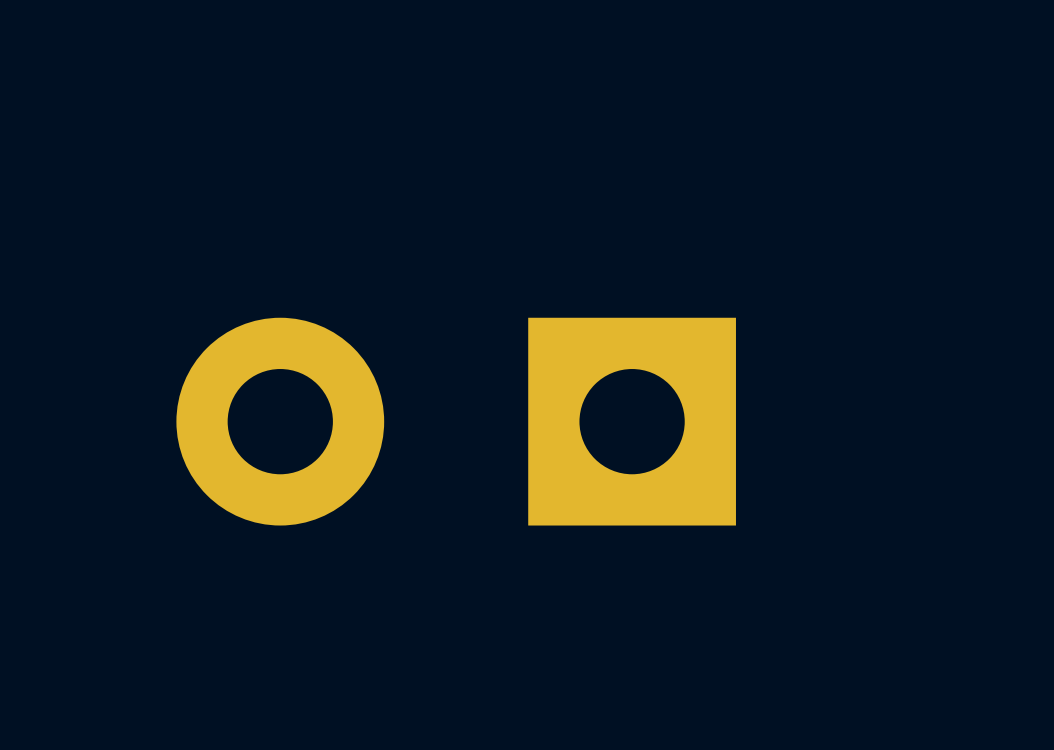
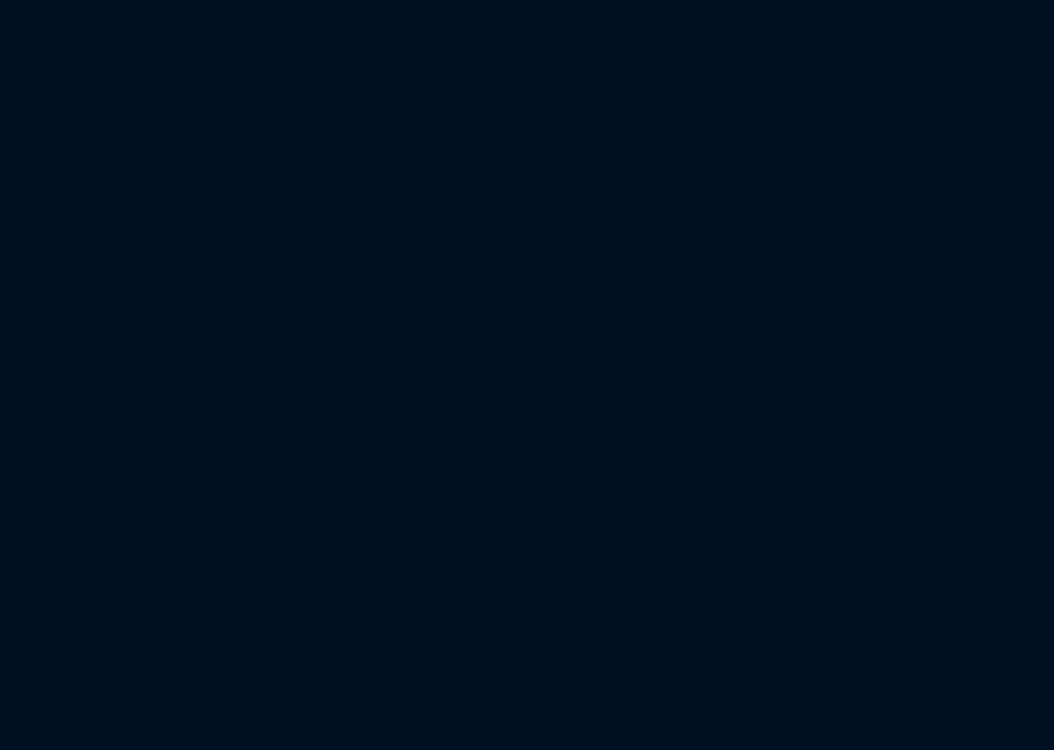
part: (456, 421) -> none

